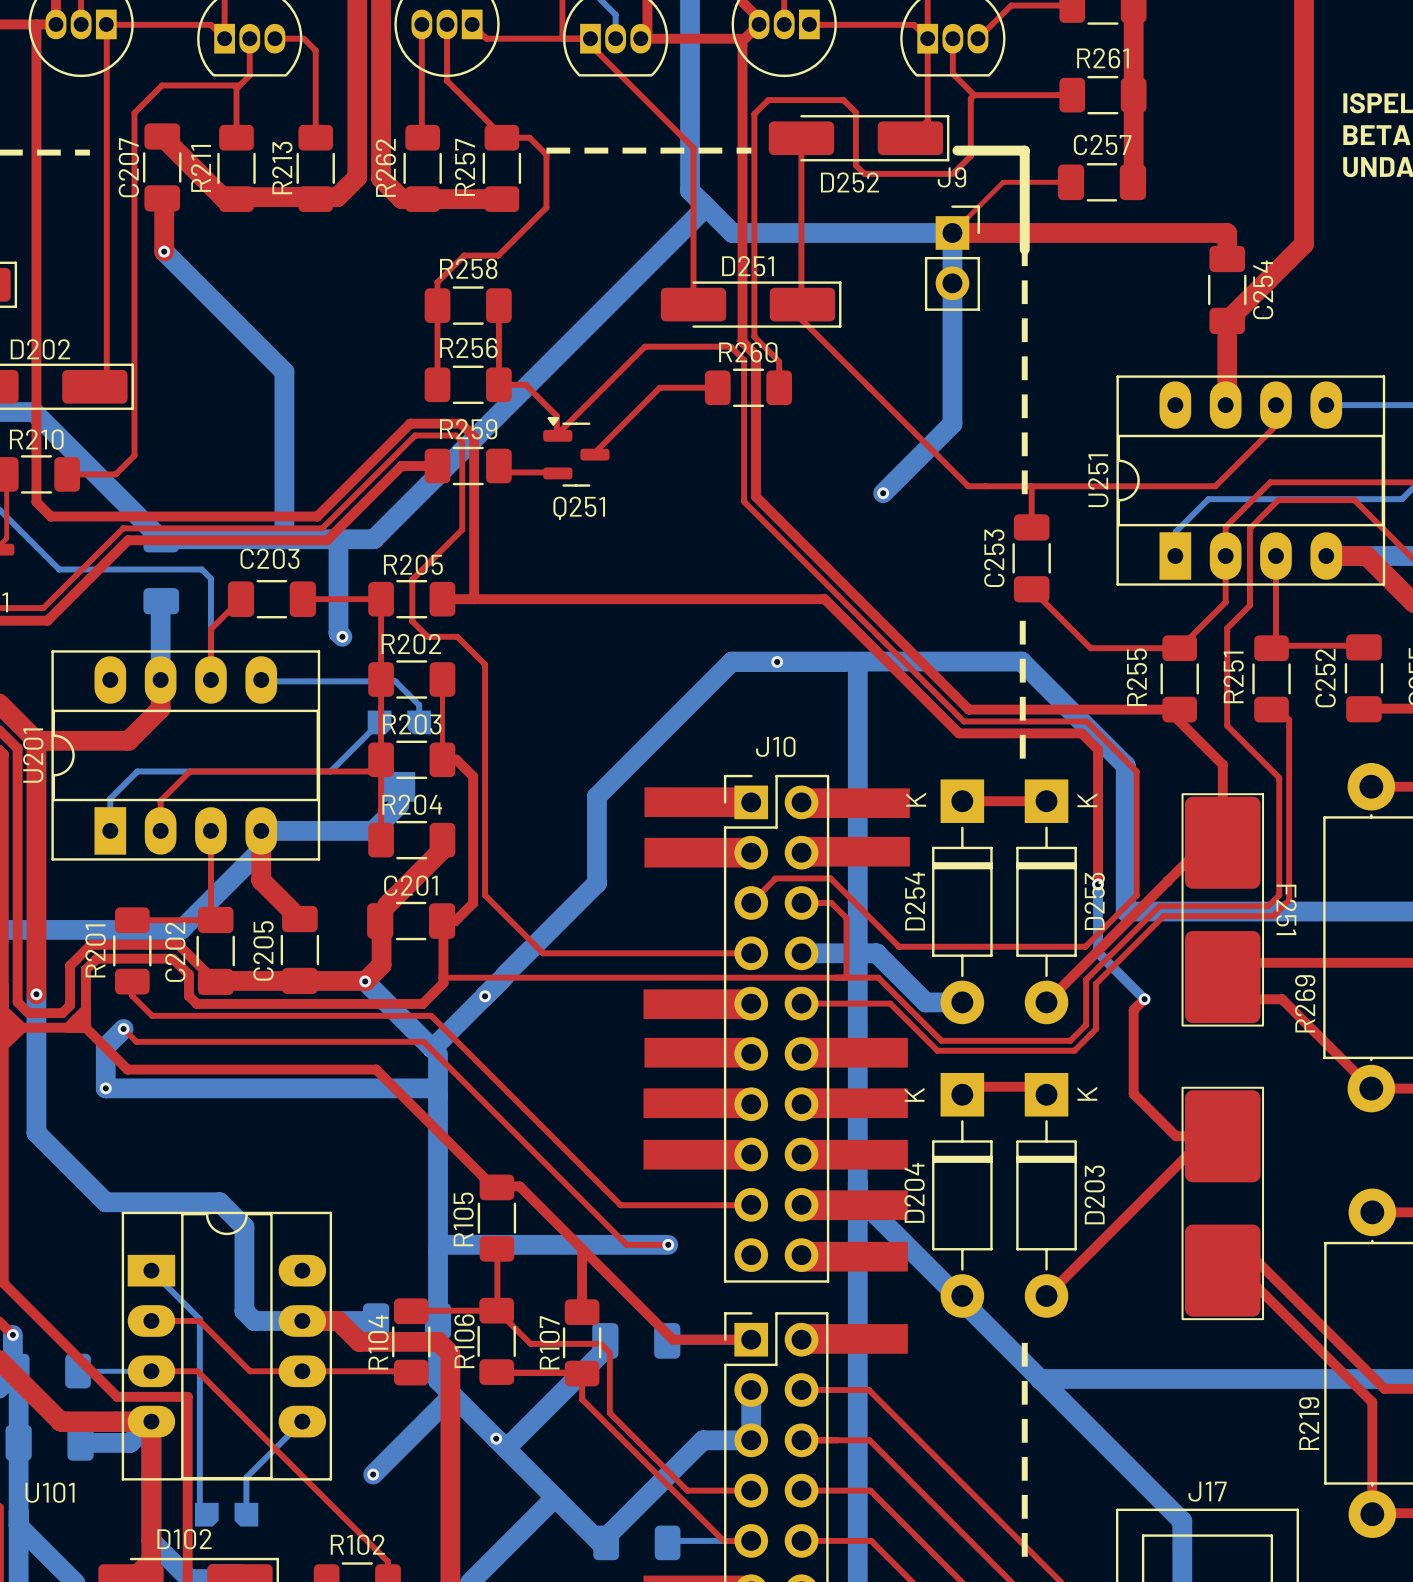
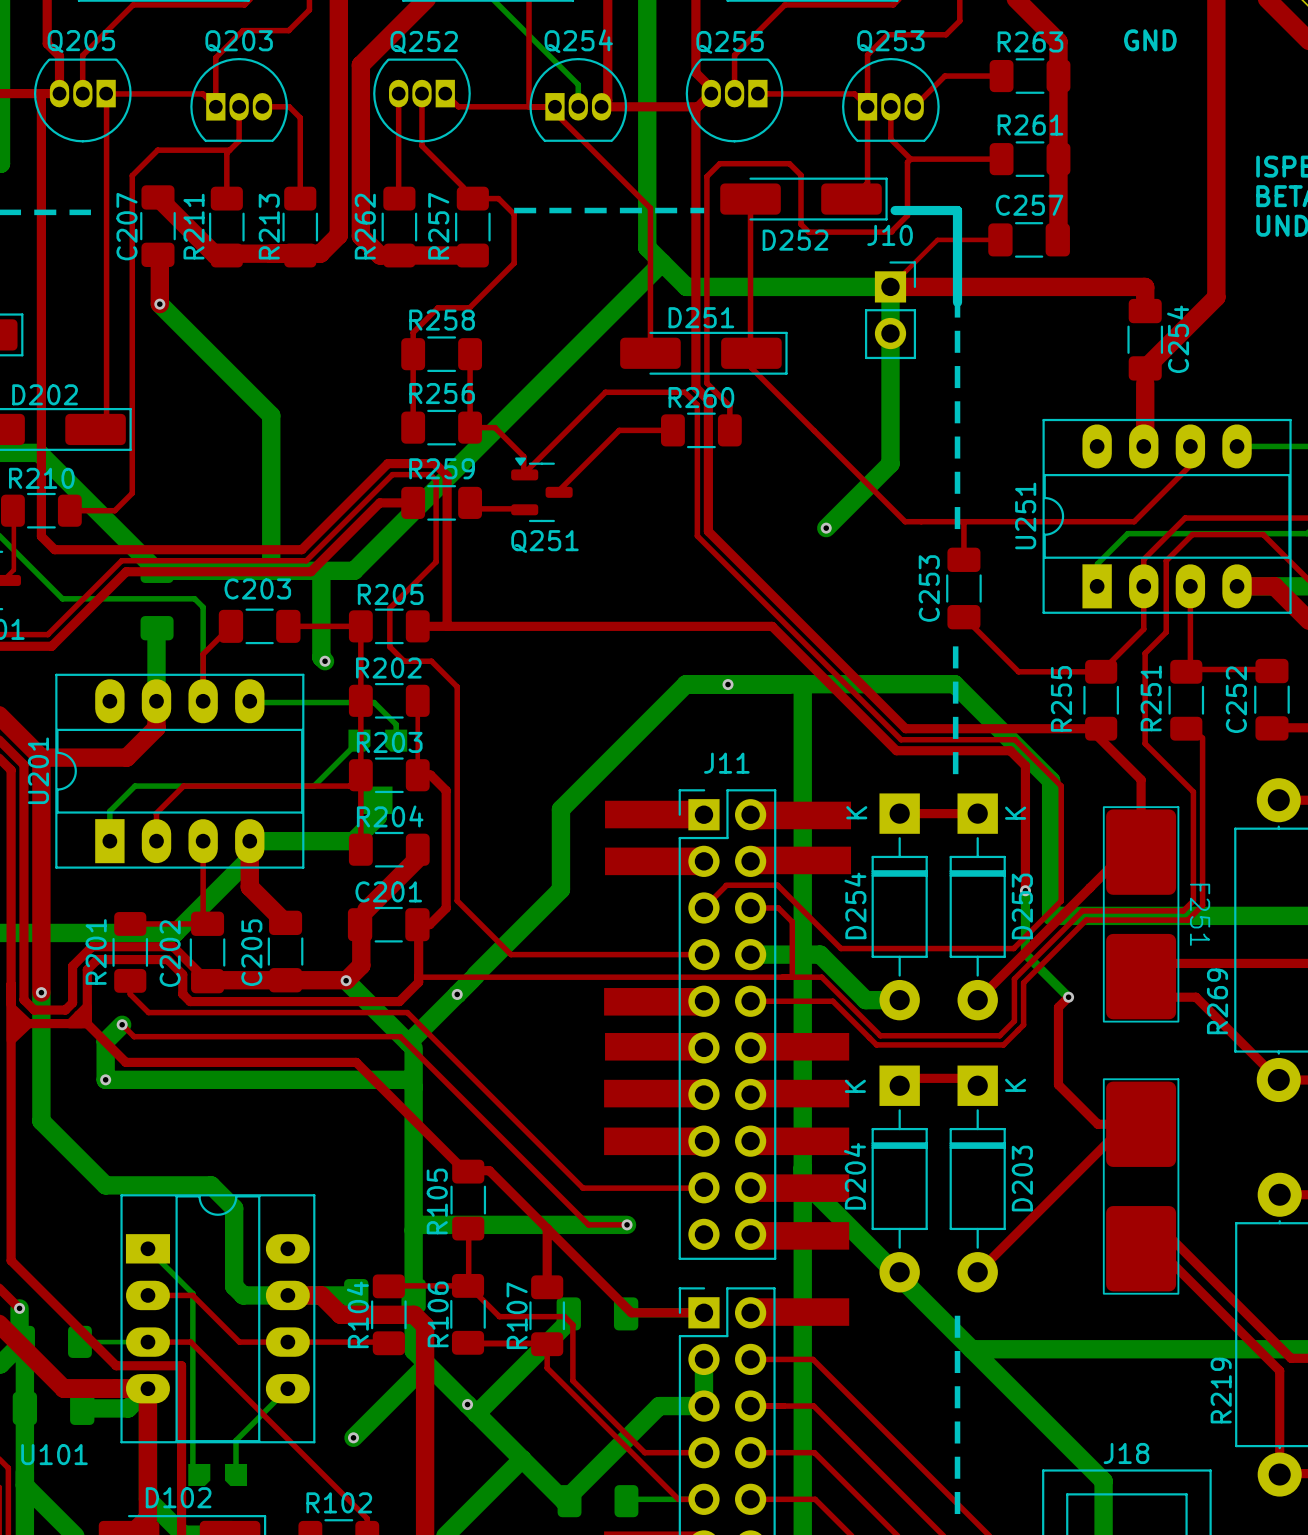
J9 name: J9 (951, 177) -> J10 (890, 235)
J10 name: J10 (775, 746) -> J11 (726, 763)
J17 name: J17 (1207, 1491) -> J18 (1126, 1453)

